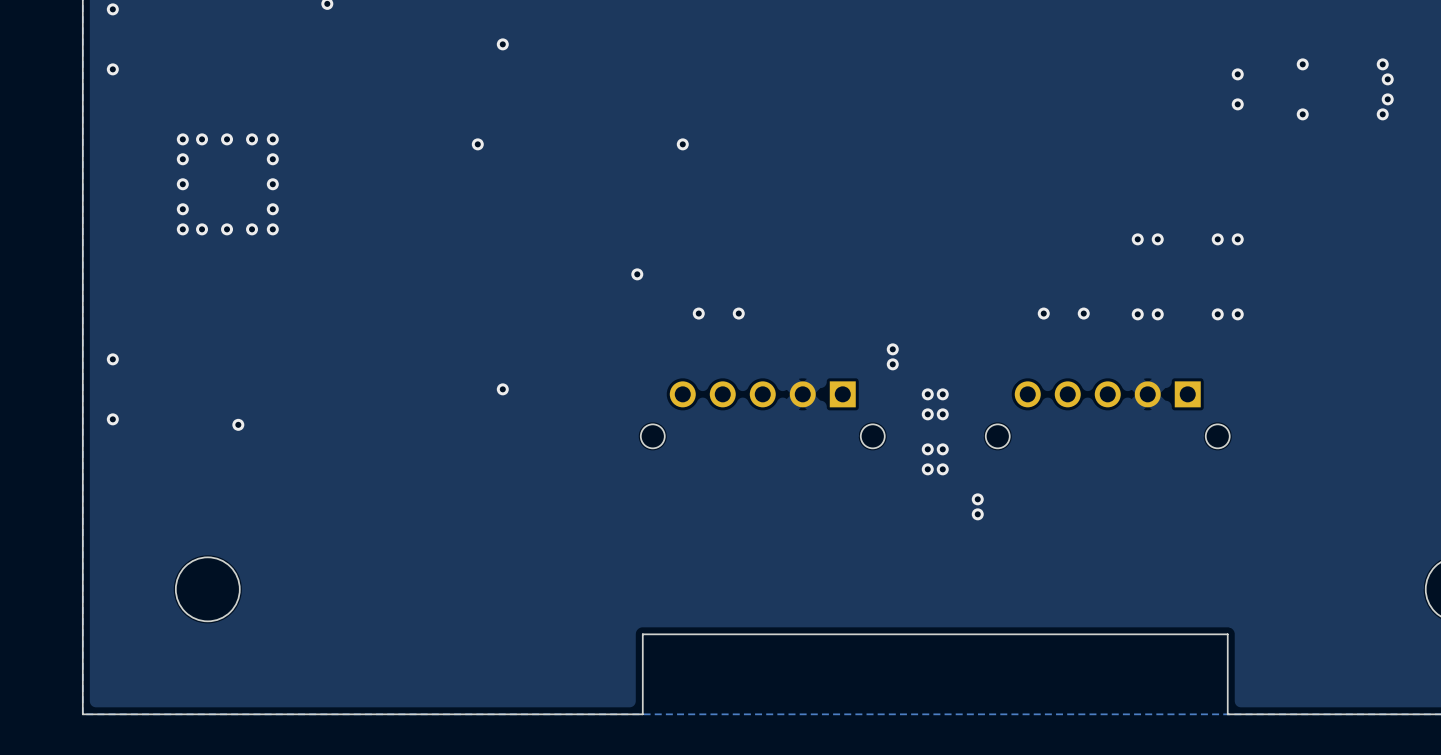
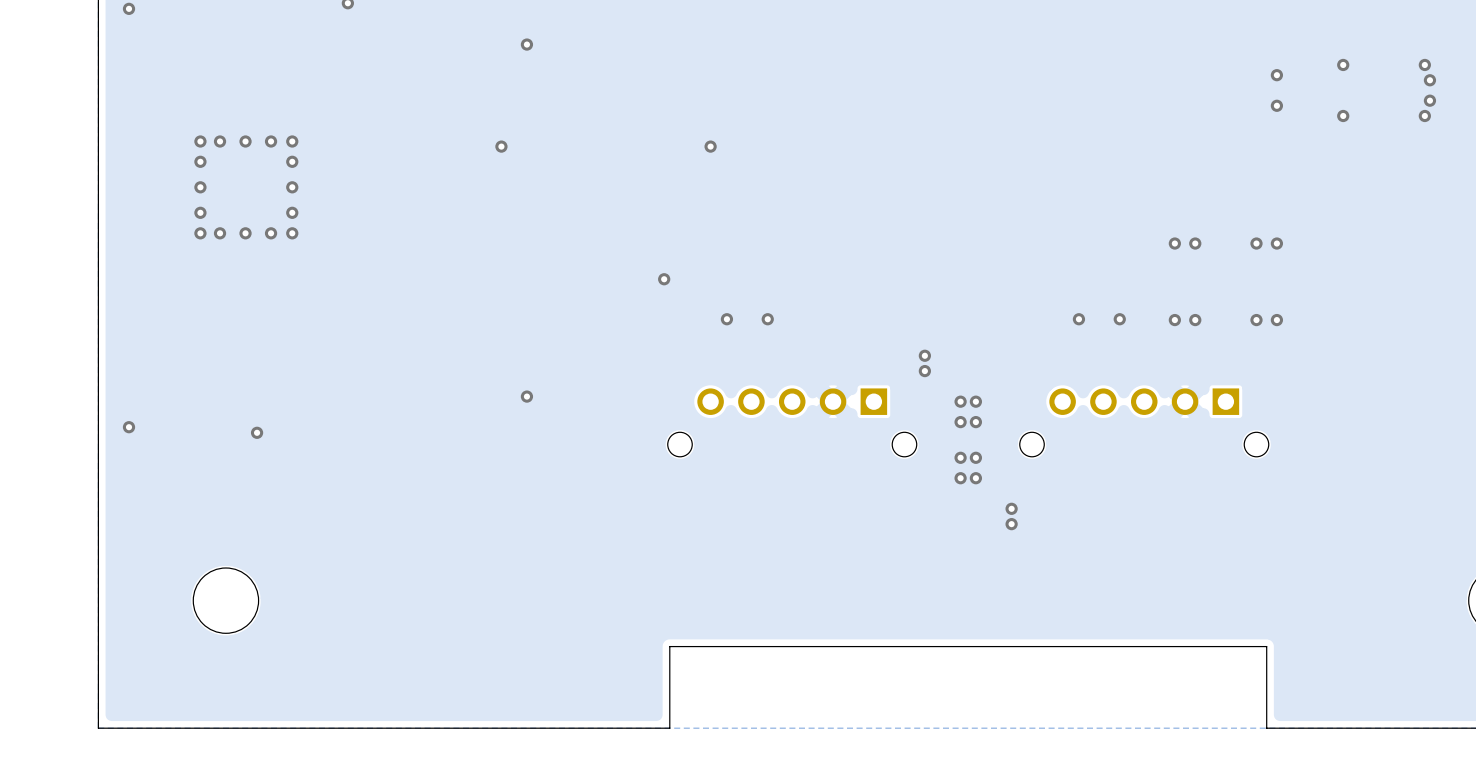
via: (112, 69) -> none
via: (112, 359) -> none

